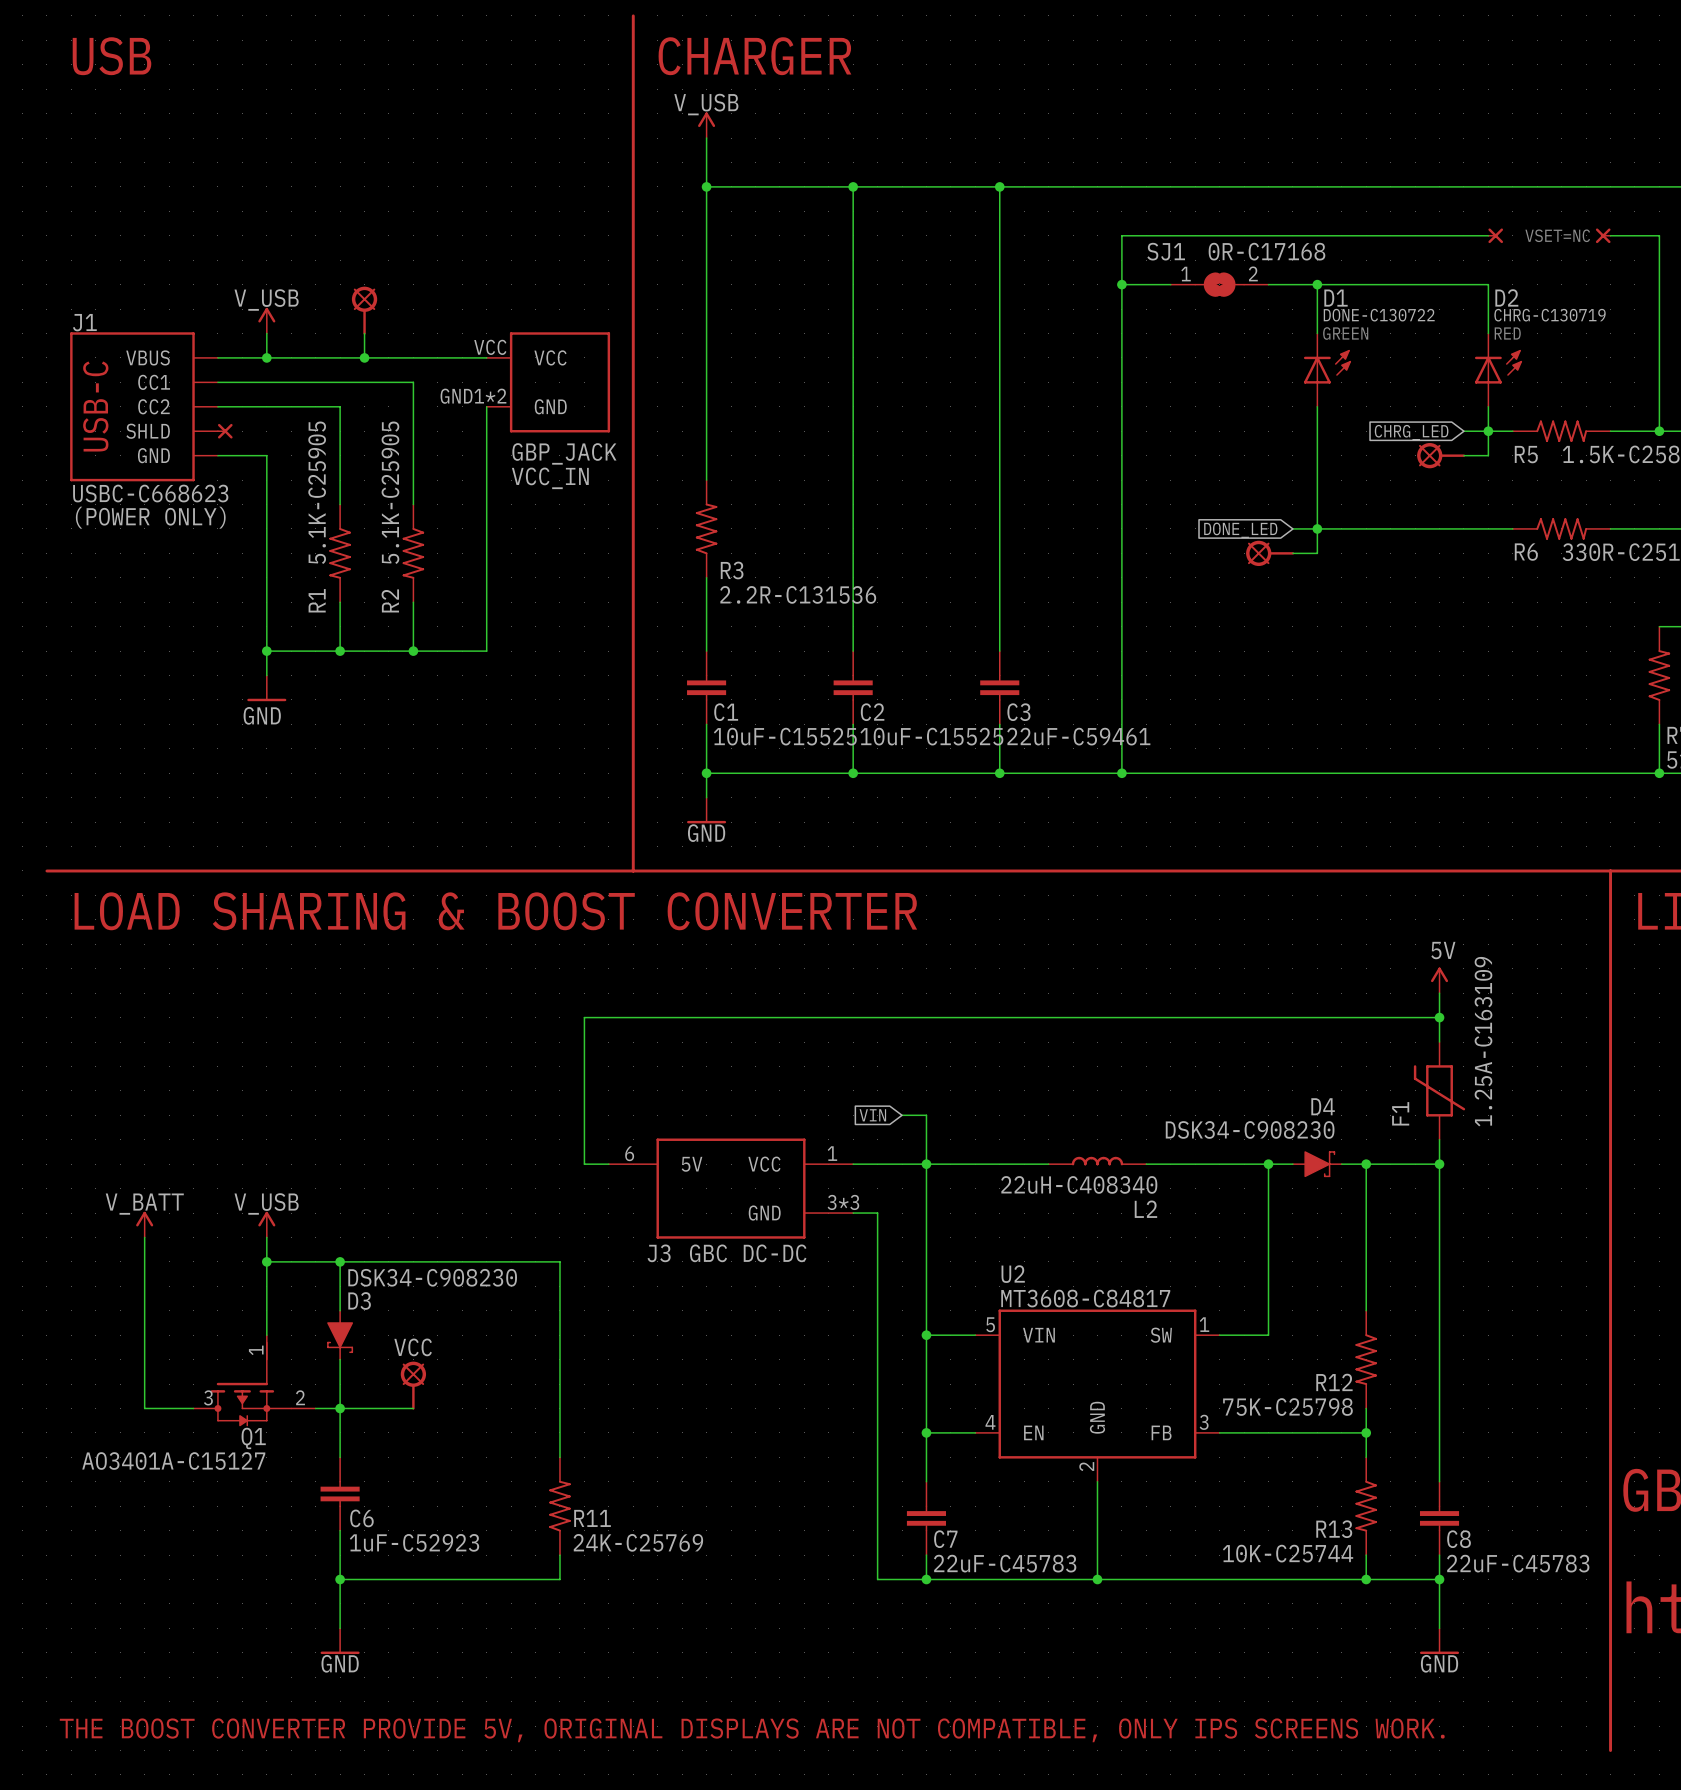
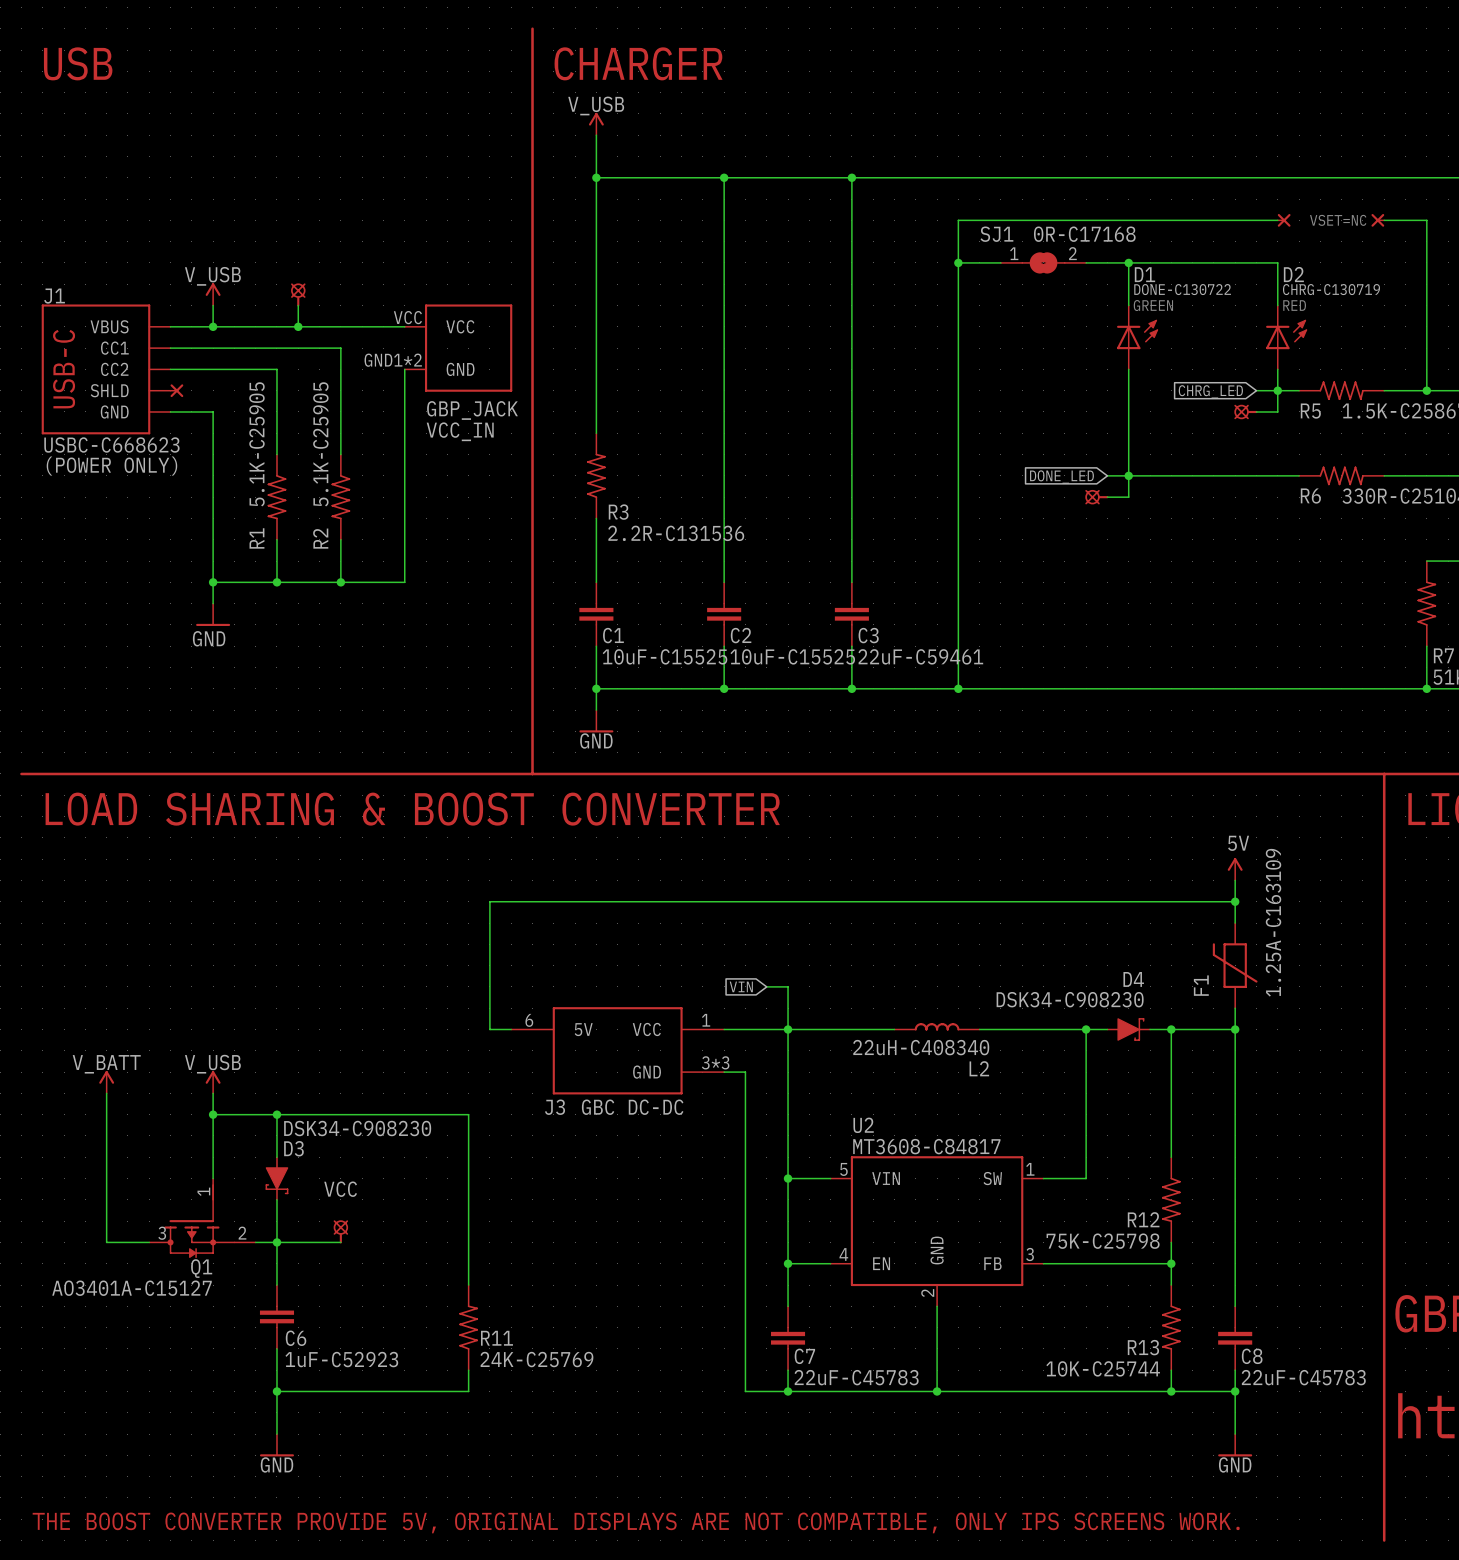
part: (364, 310) -> none
part: none -> (298, 294)
part: (1441, 455) -> none
part: none -> (1245, 411)
part: (1270, 553) -> none
part: none -> (1096, 497)
part: VCC (413, 1385) -> none
part: none -> VCC (340, 1231)

